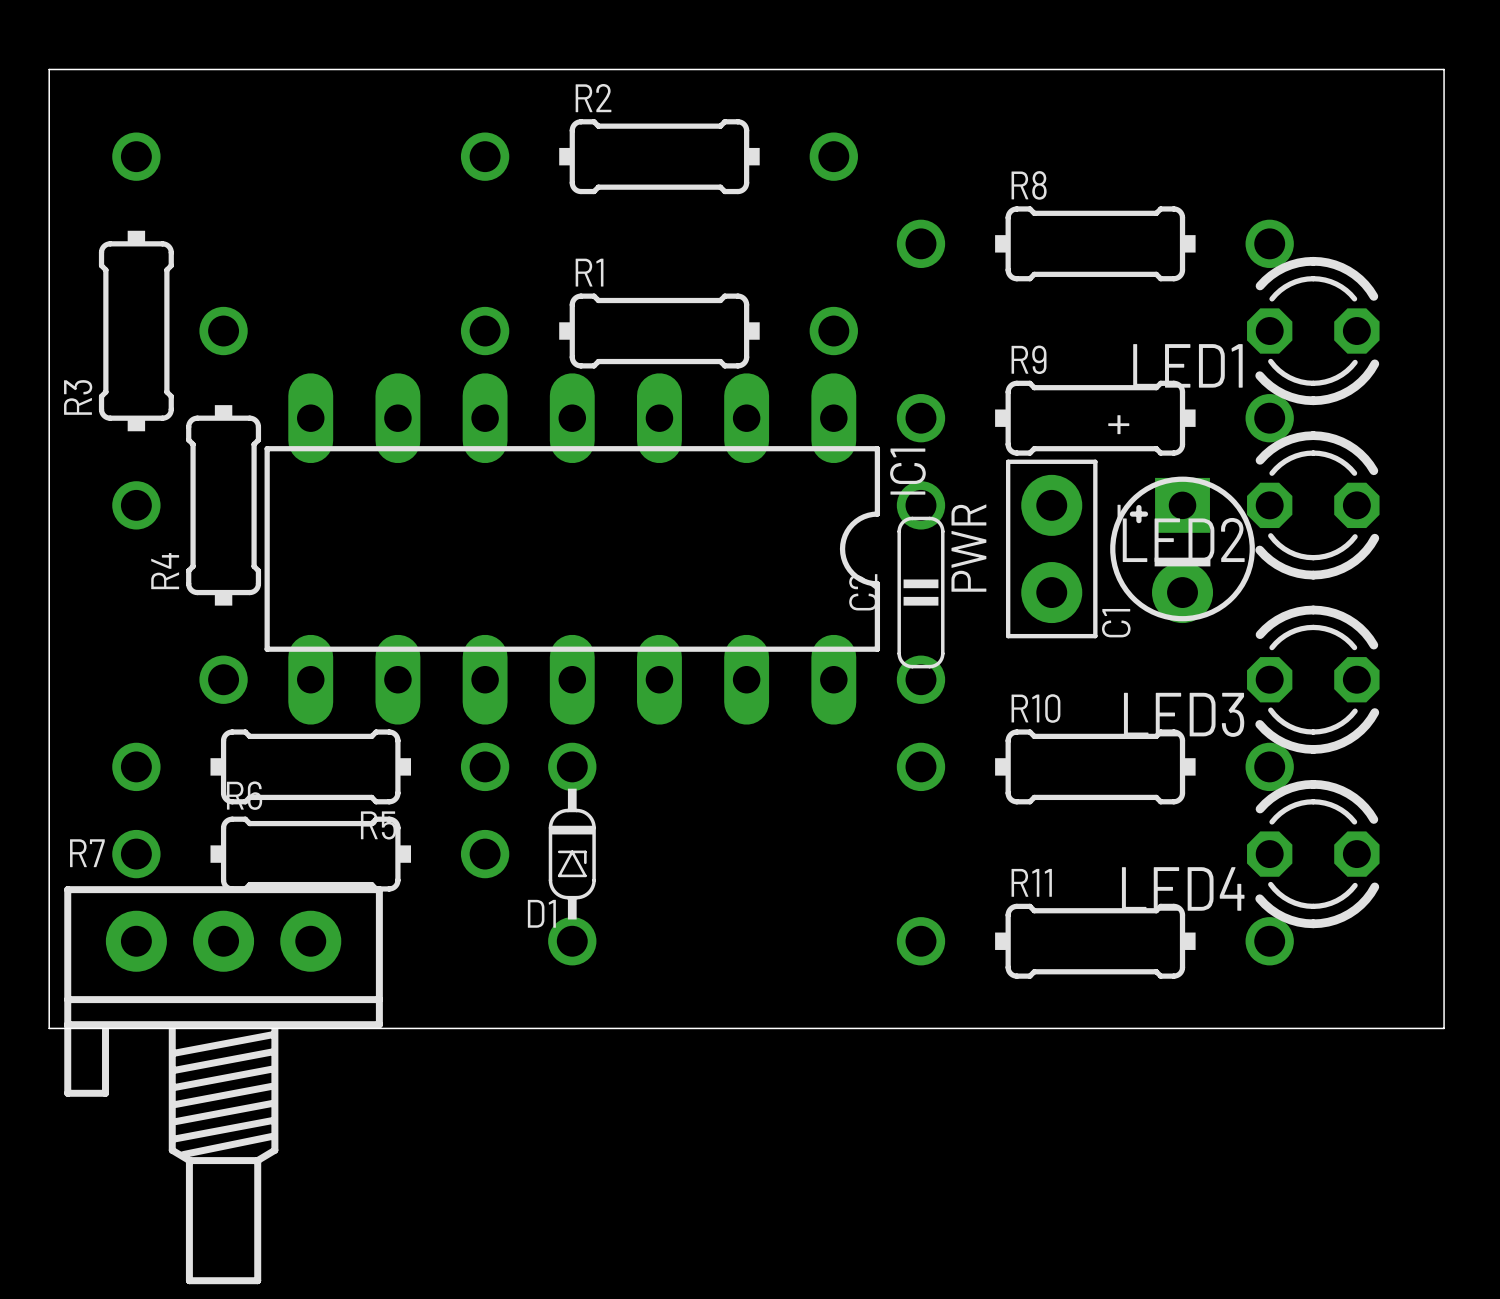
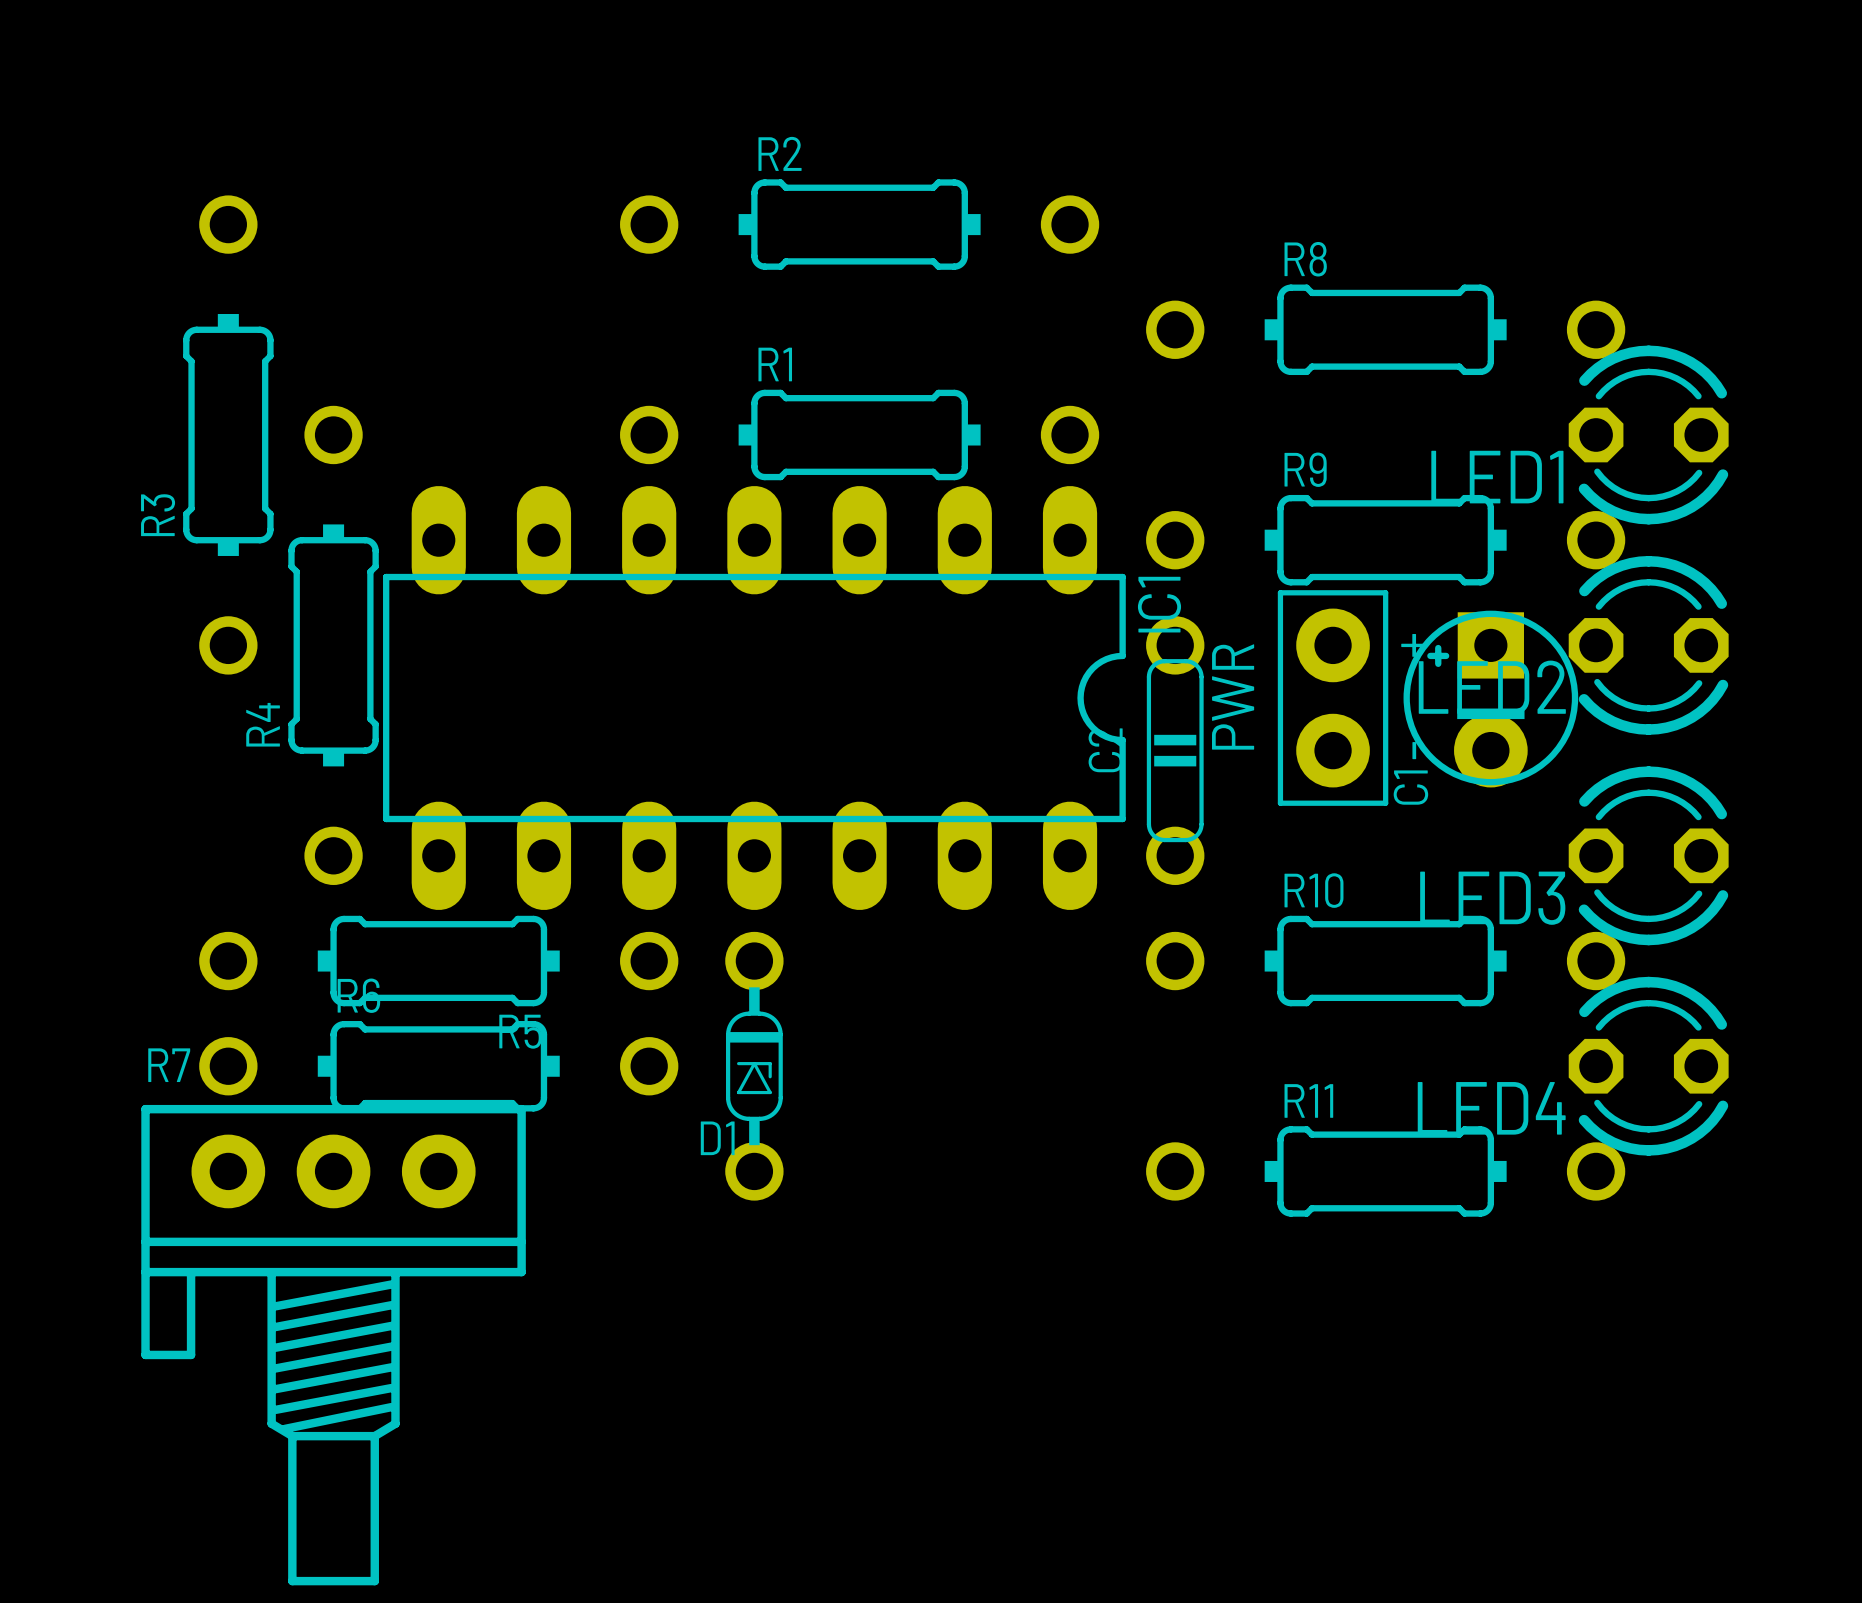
board edge: (49, 69) (1444, 69) (1444, 1028) (49, 1028) (49, 69) -> none
PWR footprint: [1005, 459, 1098, 639] -> [1277, 590, 1389, 806]

